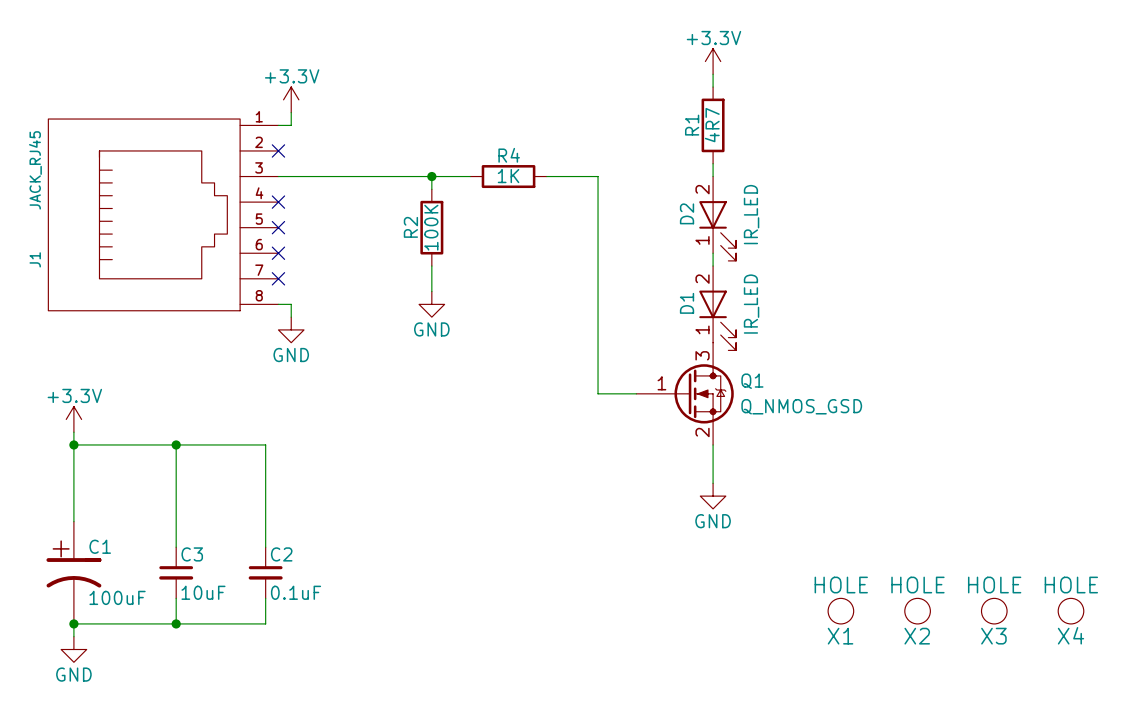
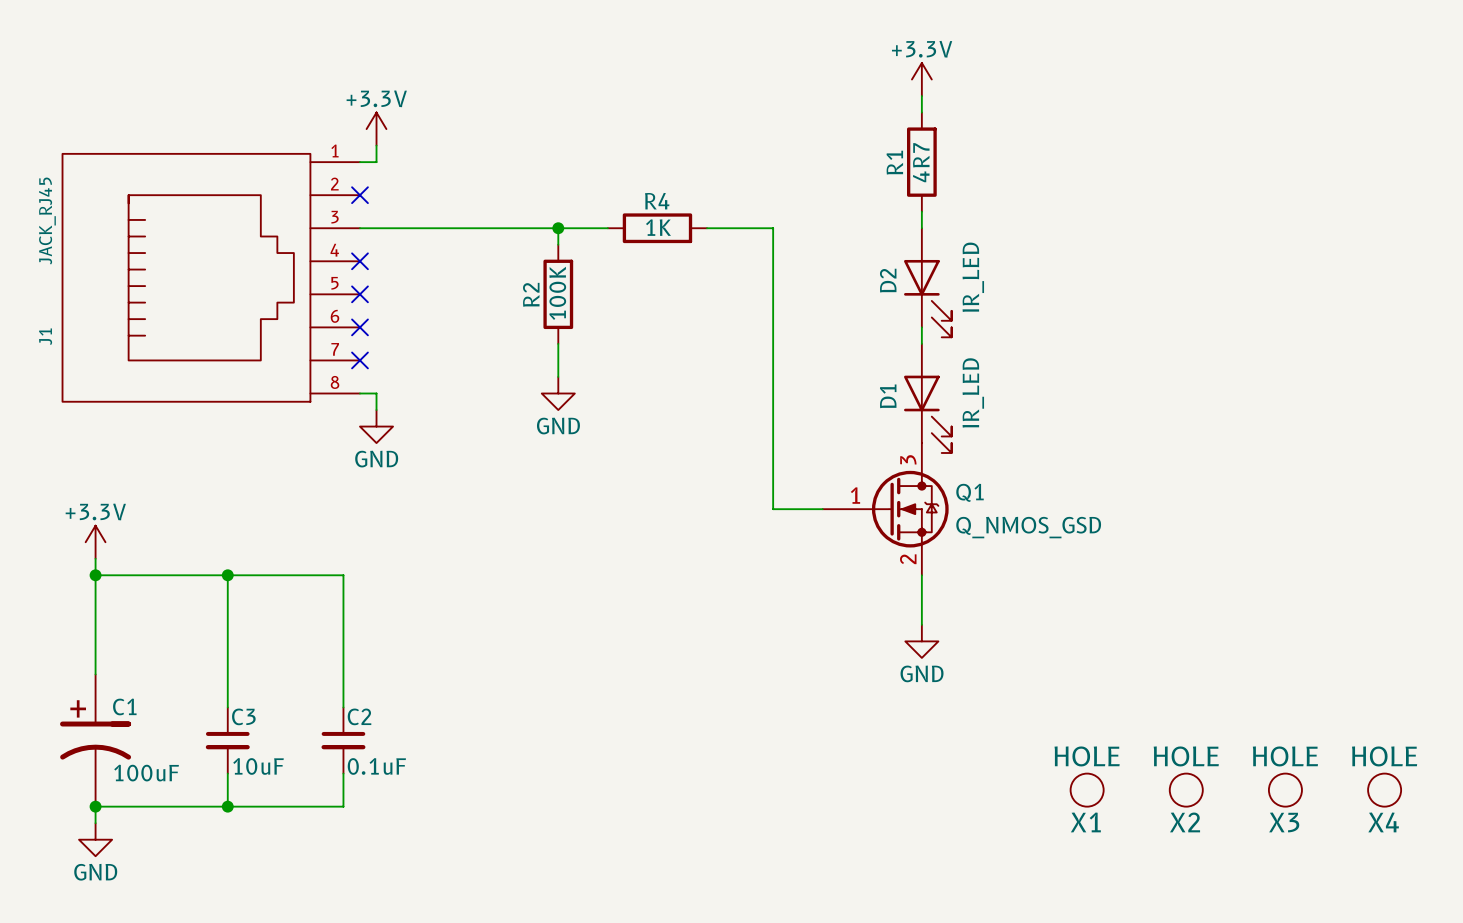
D2 pin number: 2 (702, 189) -> none
D2 pin number: 1 (702, 240) -> none
D1 pin number: 2 (702, 279) -> none
D1 pin number: 1 (702, 329) -> none

